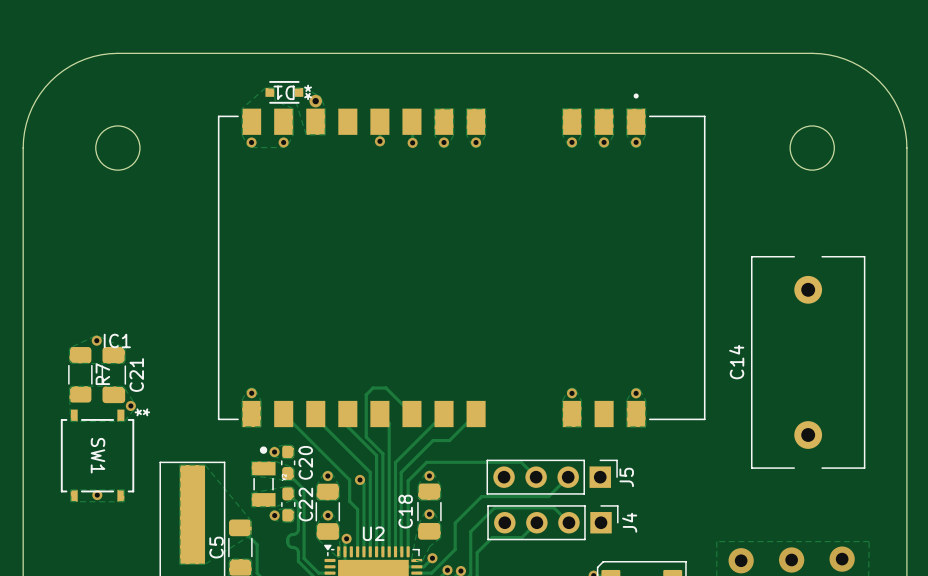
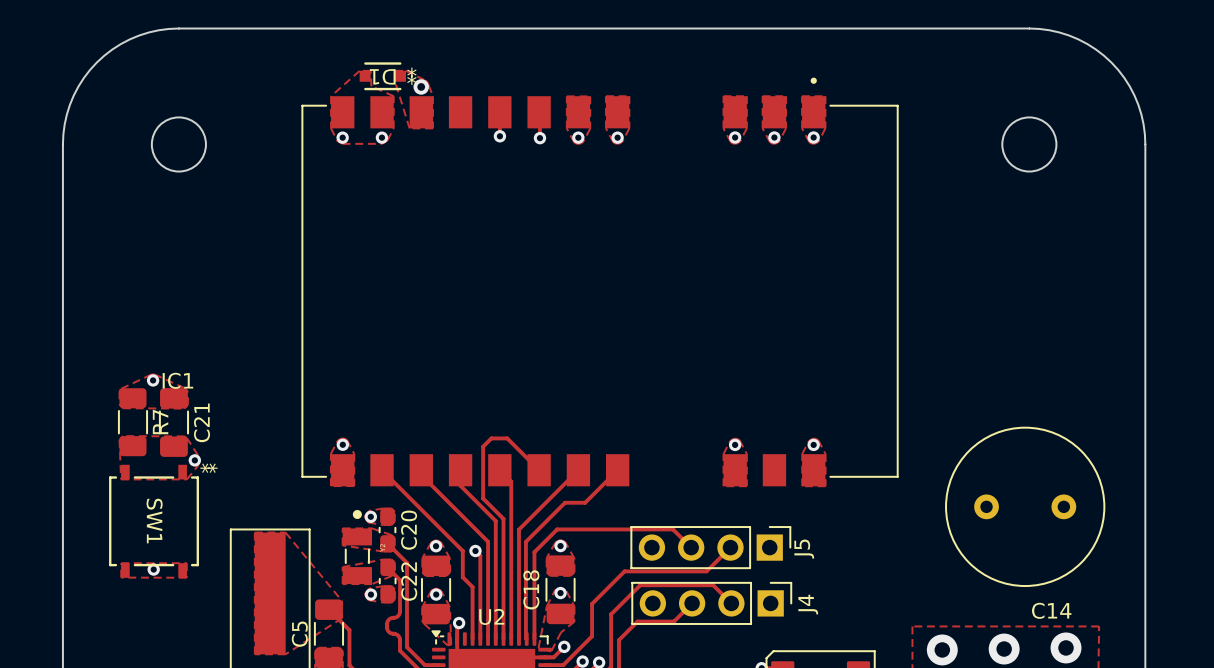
C14 footprint: [750, 255, 866, 469] -> [945, 426, 1106, 587]
C14 name position: C14 (736, 362) -> C14 (1051, 610)

